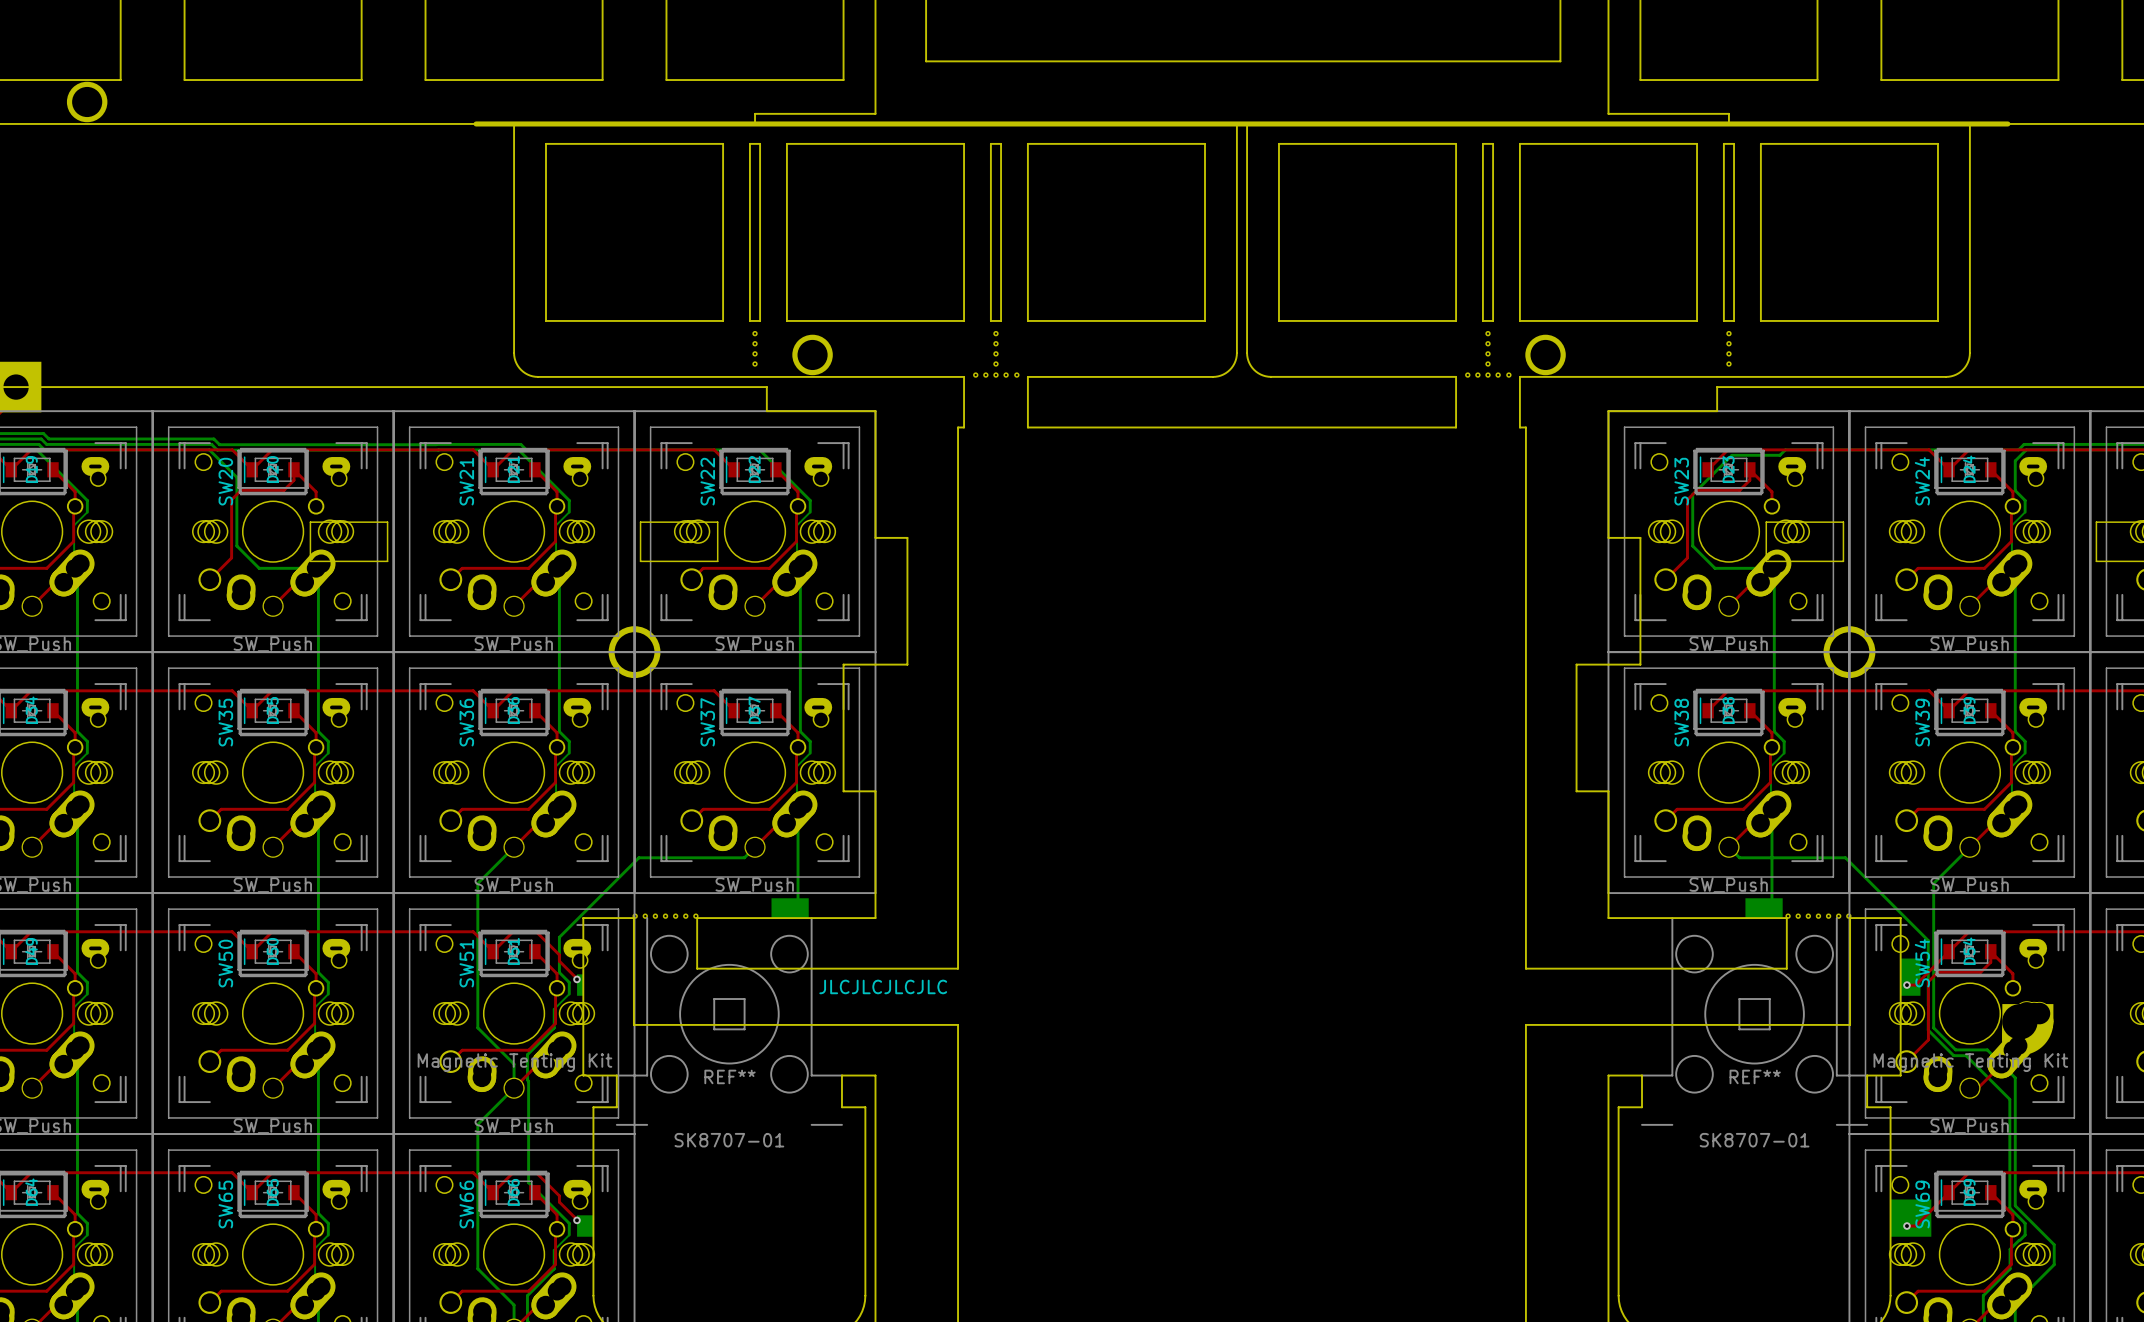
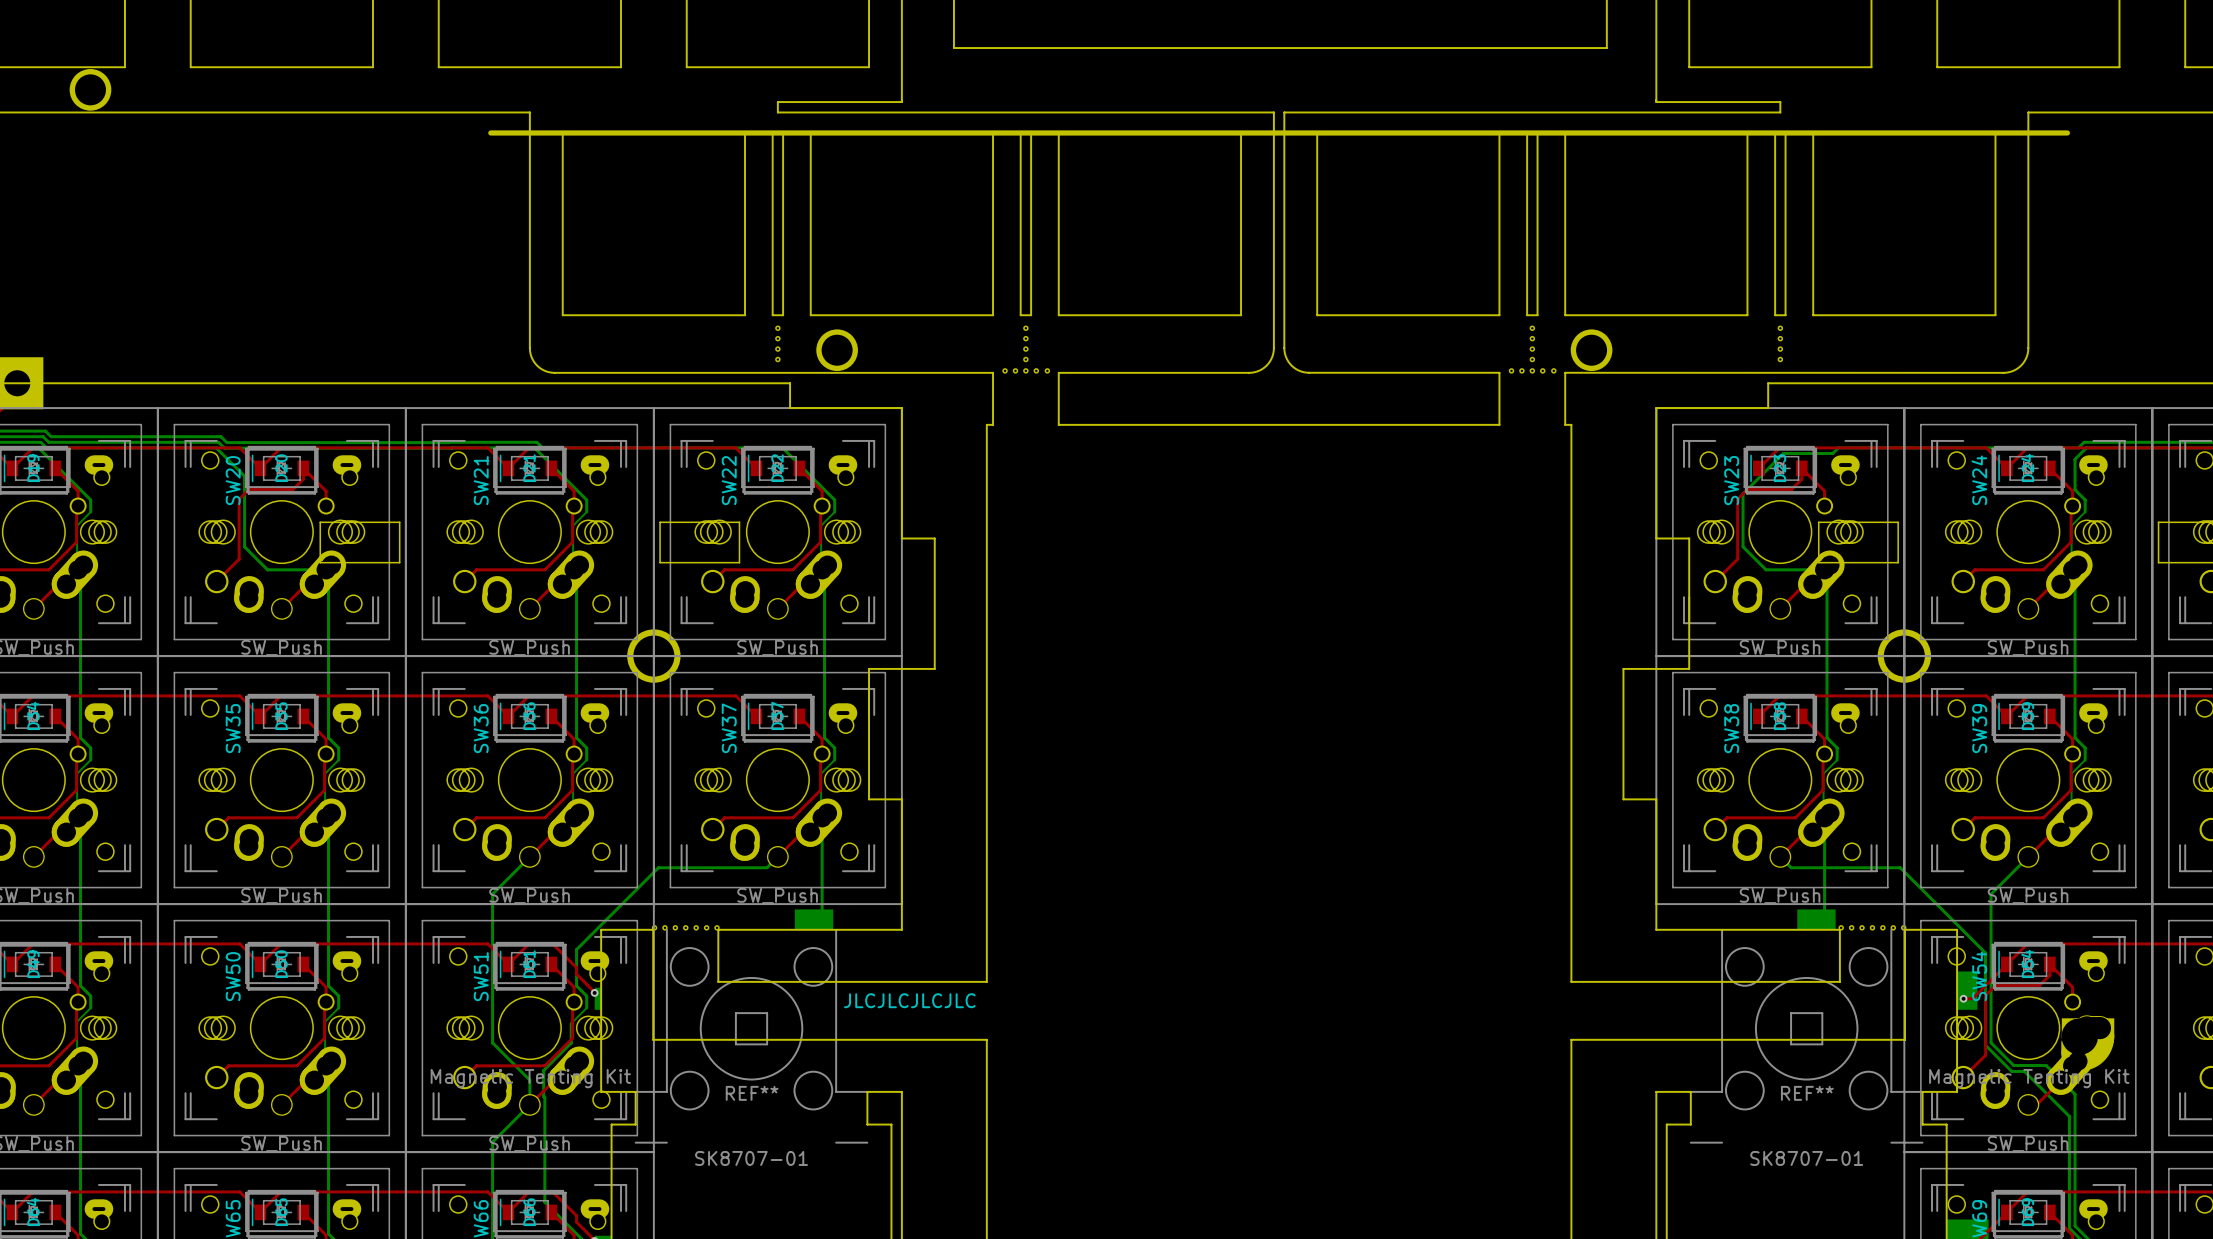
board edge: (476, 123) (2007, 123) -> (490, 132) (2067, 132)

